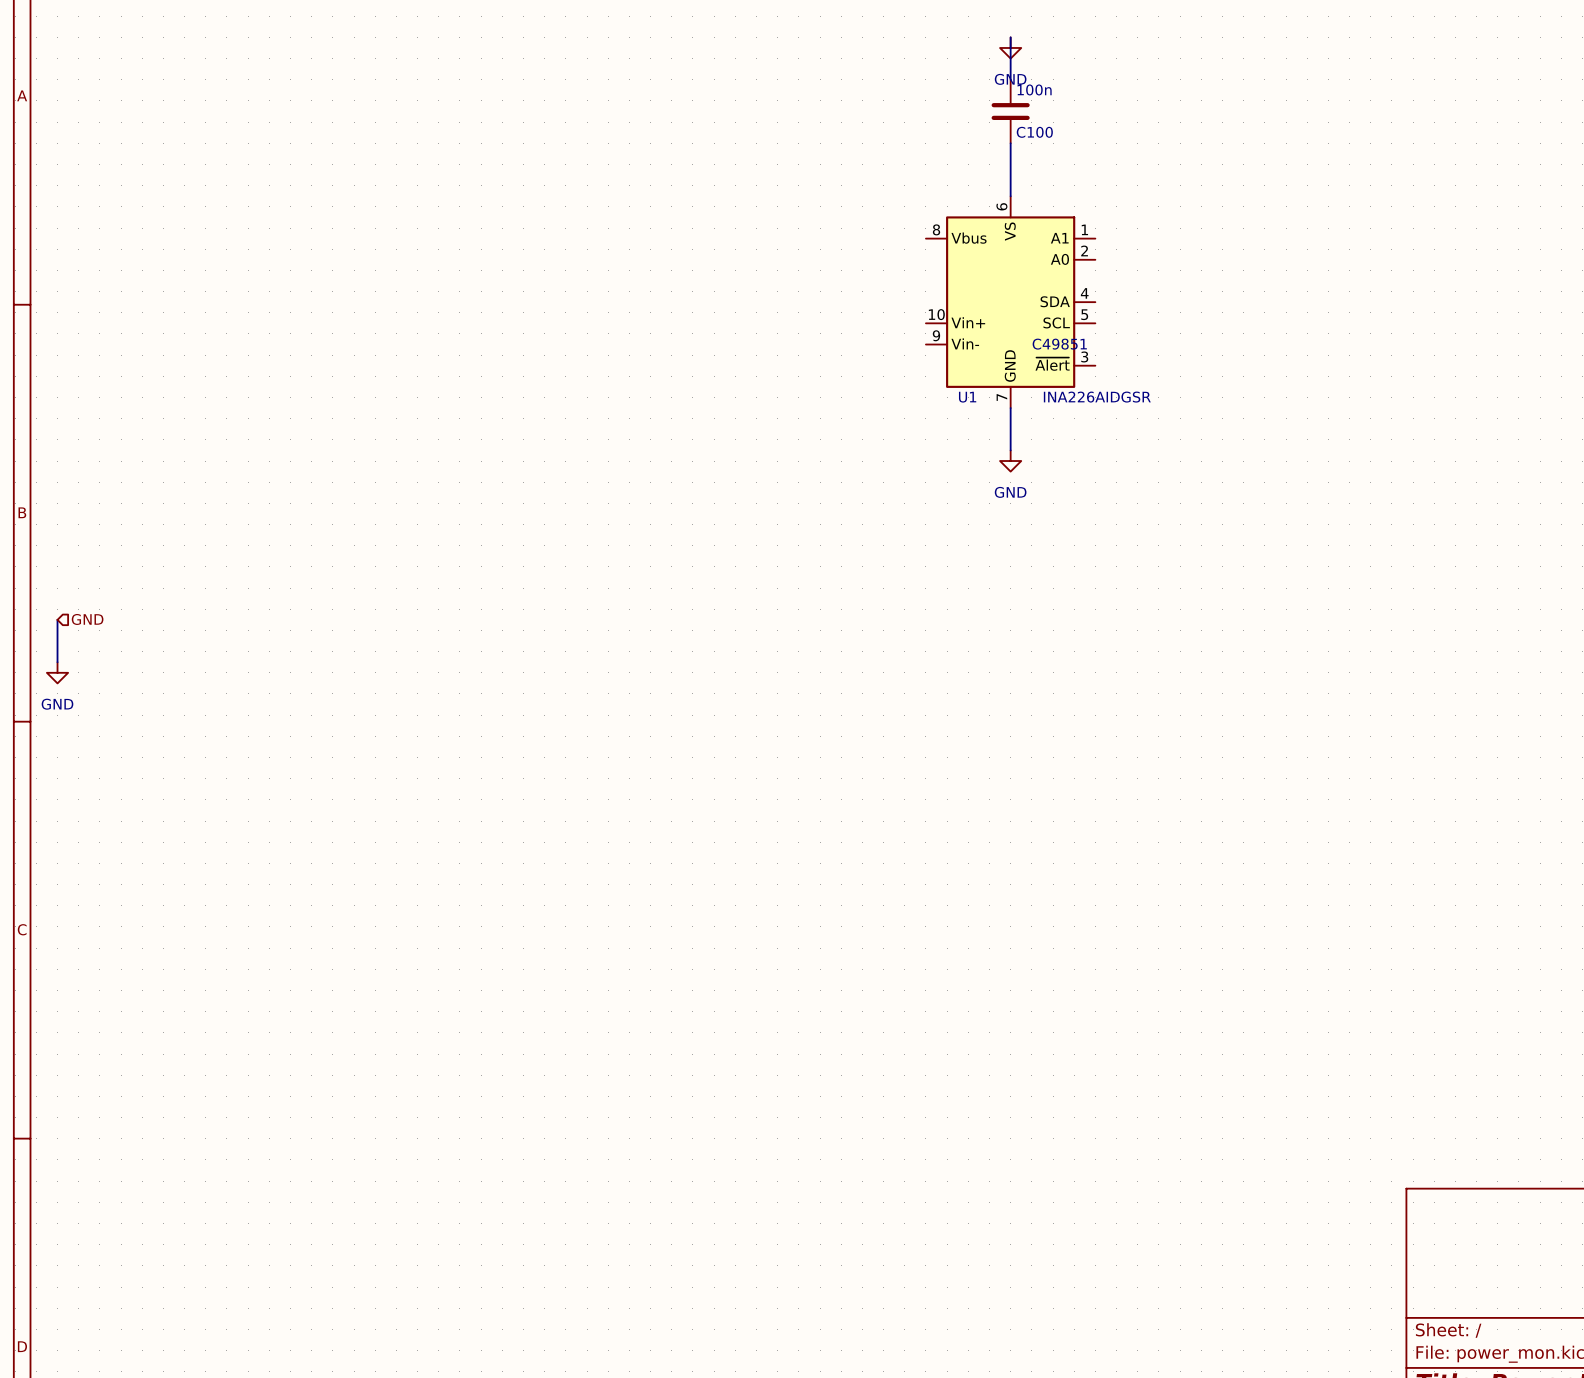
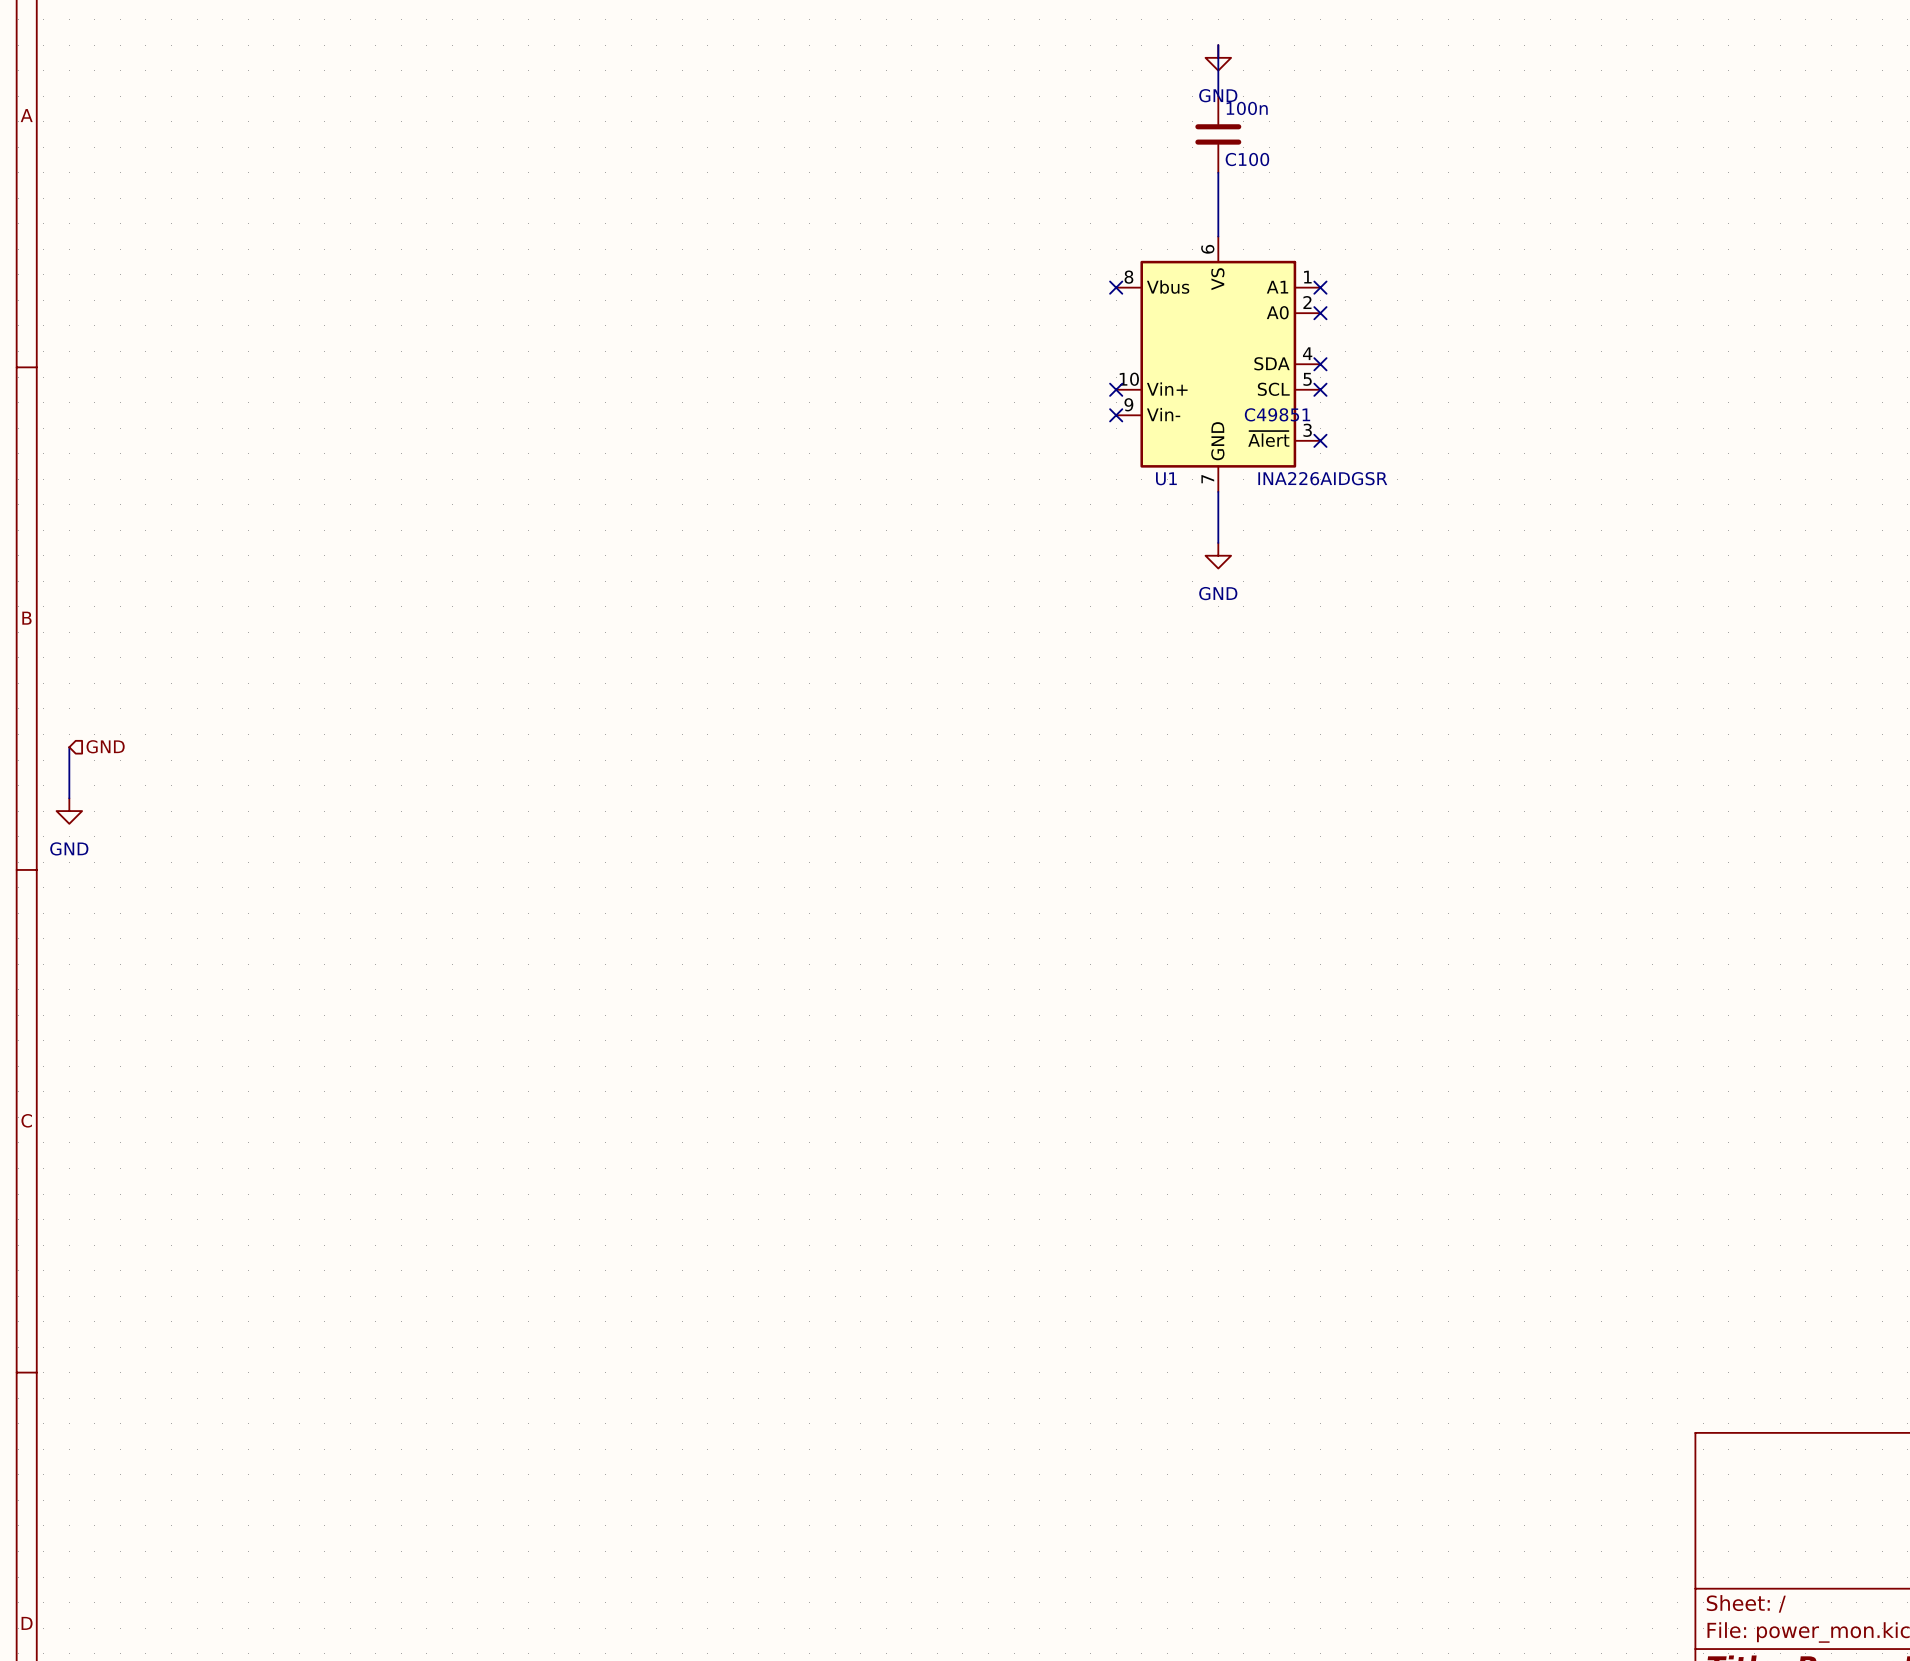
no-connect mark: none -> (1116, 287)
no-connect mark: none -> (1320, 287)
no-connect mark: none -> (1320, 313)
no-connect mark: none -> (1320, 364)
no-connect mark: none -> (1116, 389)
no-connect mark: none -> (1320, 389)
no-connect mark: none -> (1116, 415)
no-connect mark: none -> (1320, 440)

